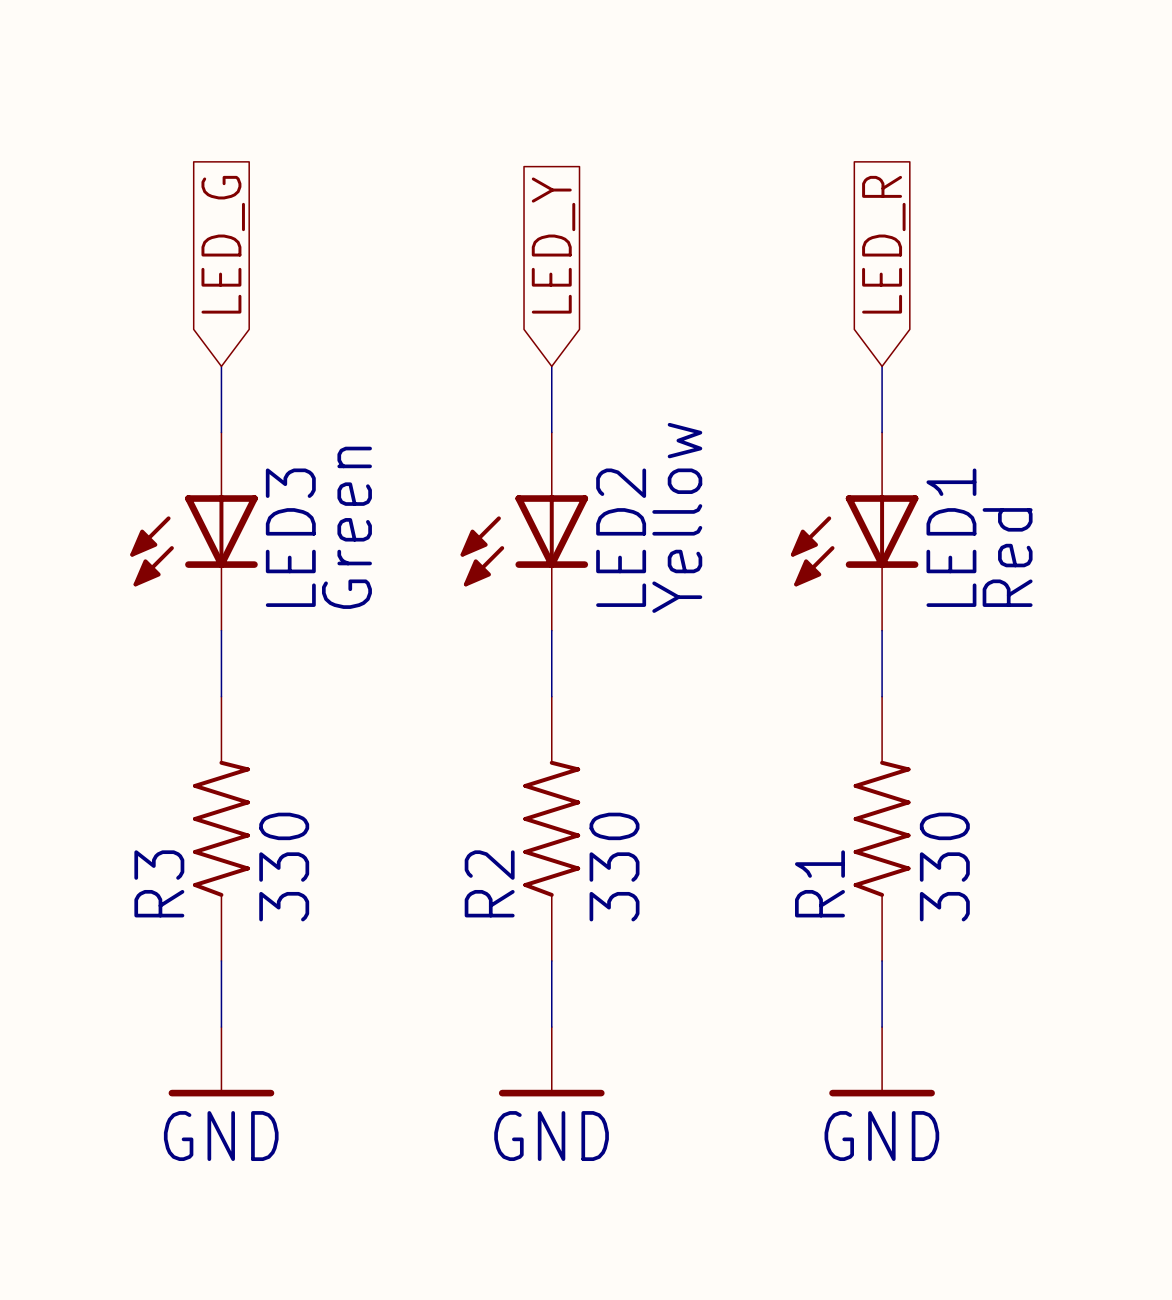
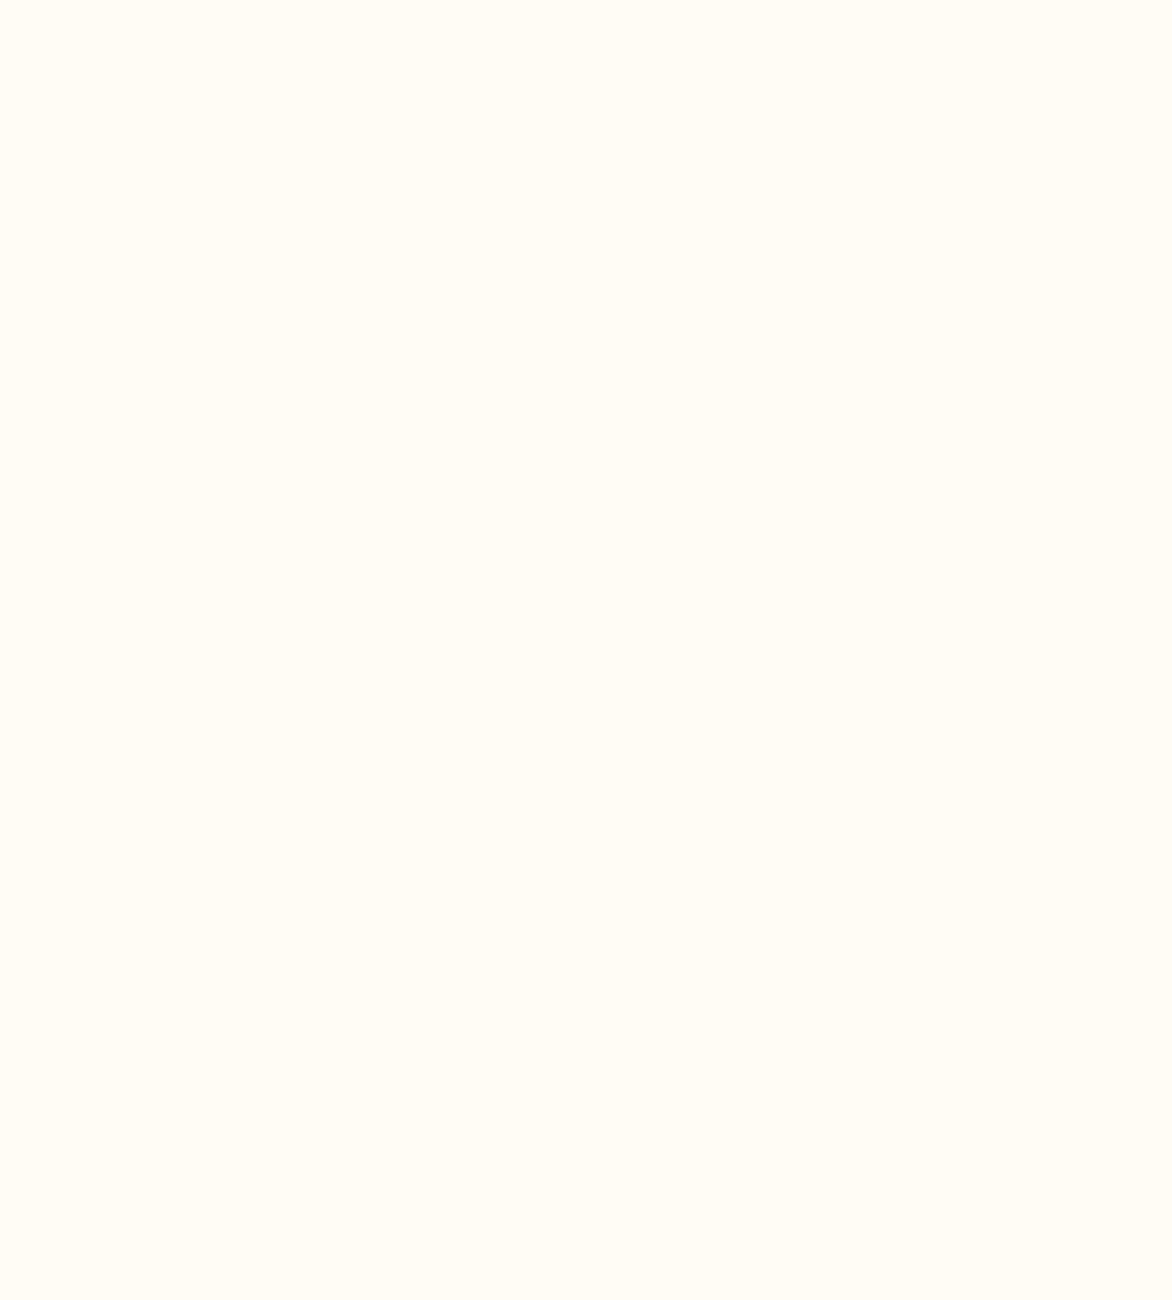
global label: LED_G (223, 244) -> none
global label: LED_R (883, 244) -> none
global label: LED_Y (553, 245) -> none
wire: (221, 366) (221, 432) -> none
wire: (551, 366) (551, 432) -> none
wire: (882, 366) (882, 432) -> none
LED3: Green (194, 531) -> none
LED2: Yellow (524, 531) -> none
LED1: Red (854, 531) -> none
wire: (221, 630) (221, 696) -> none
wire: (551, 630) (551, 696) -> none
wire: (882, 630) (882, 696) -> none
R3: 330 (221, 828) -> none
R2: 330 (551, 828) -> none
R1: 330 (882, 828) -> none
wire: (221, 960) (221, 1027) -> none
wire: (551, 960) (551, 1027) -> none
wire: (882, 960) (882, 1027) -> none
power symbol: GND (221, 1061) -> none
power symbol: GND (551, 1061) -> none
power symbol: GND (882, 1061) -> none

